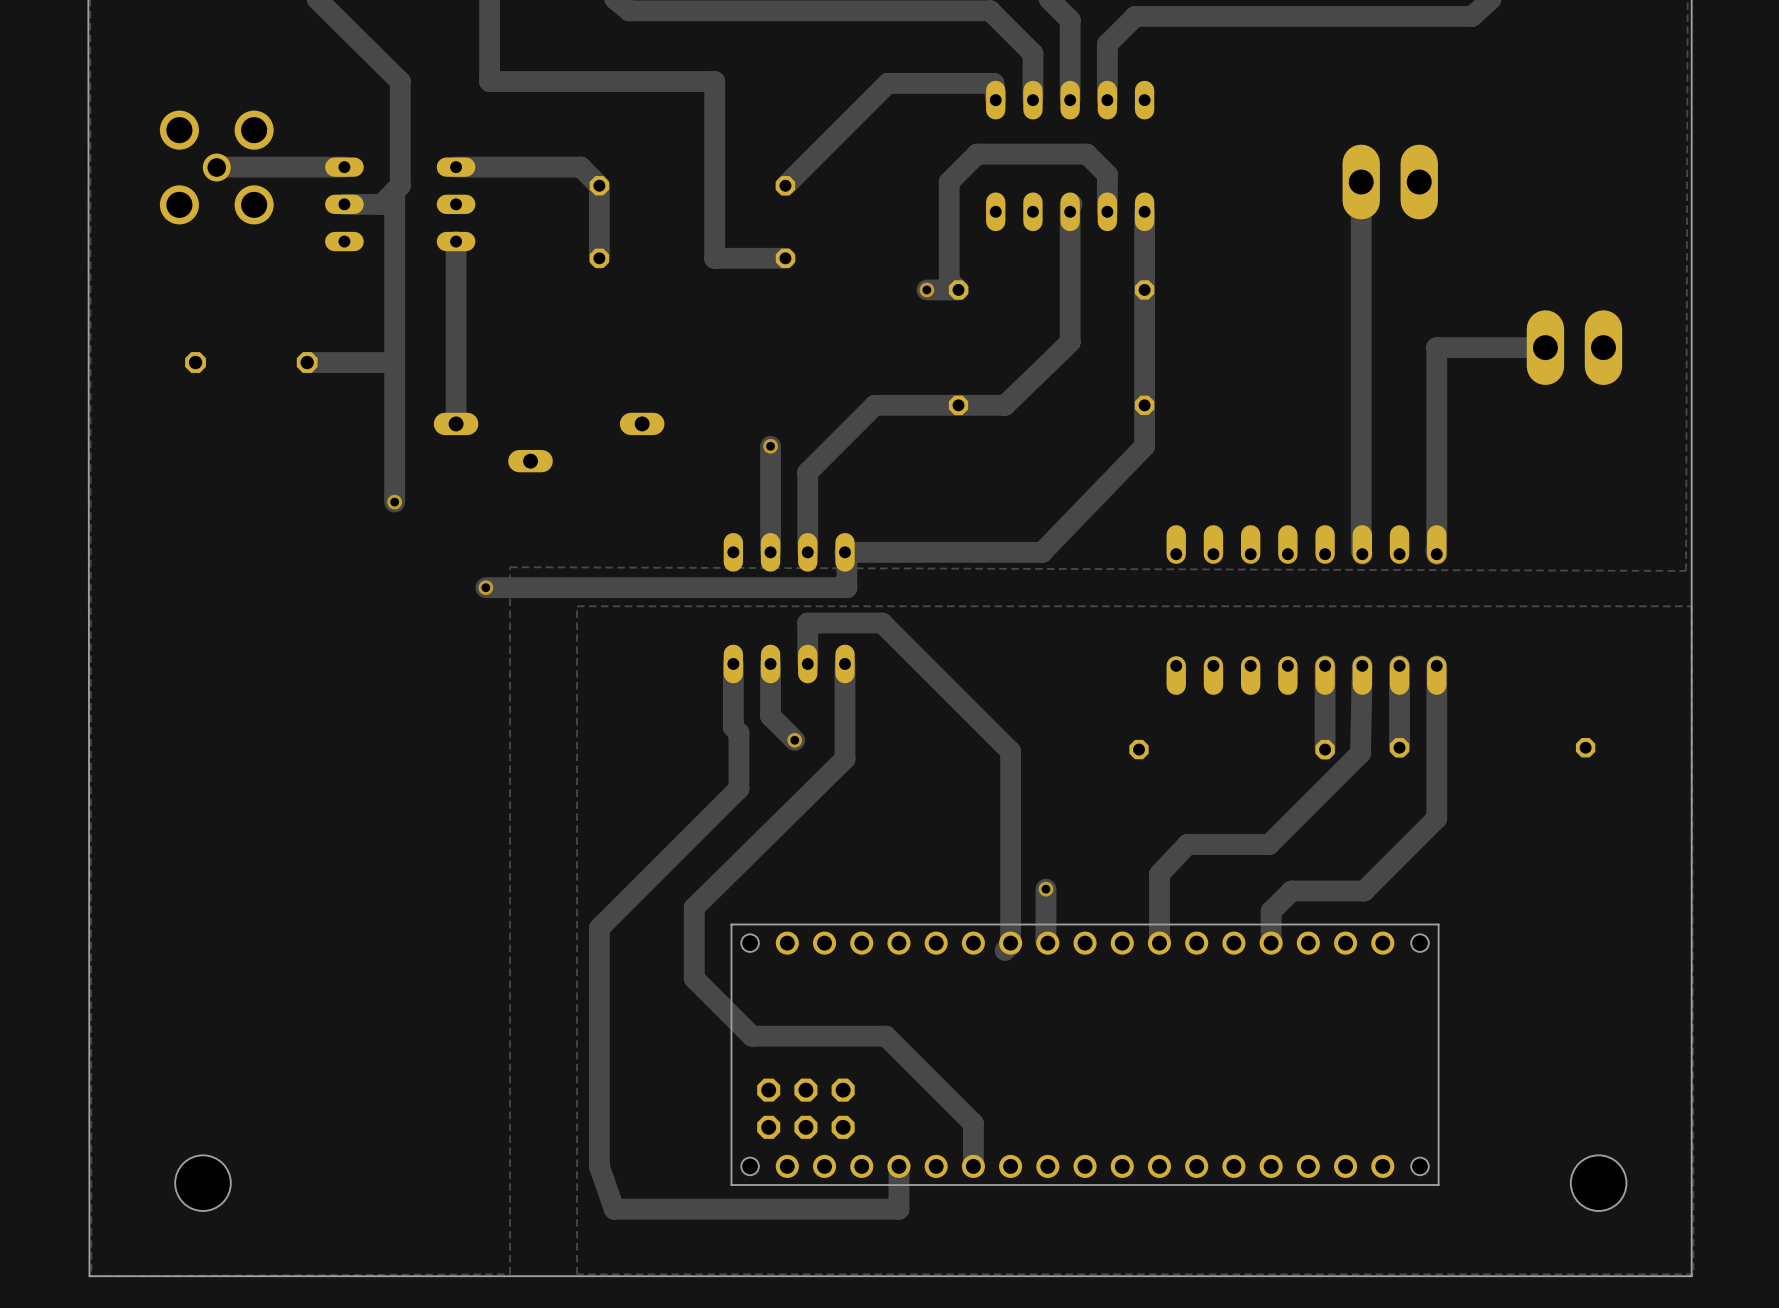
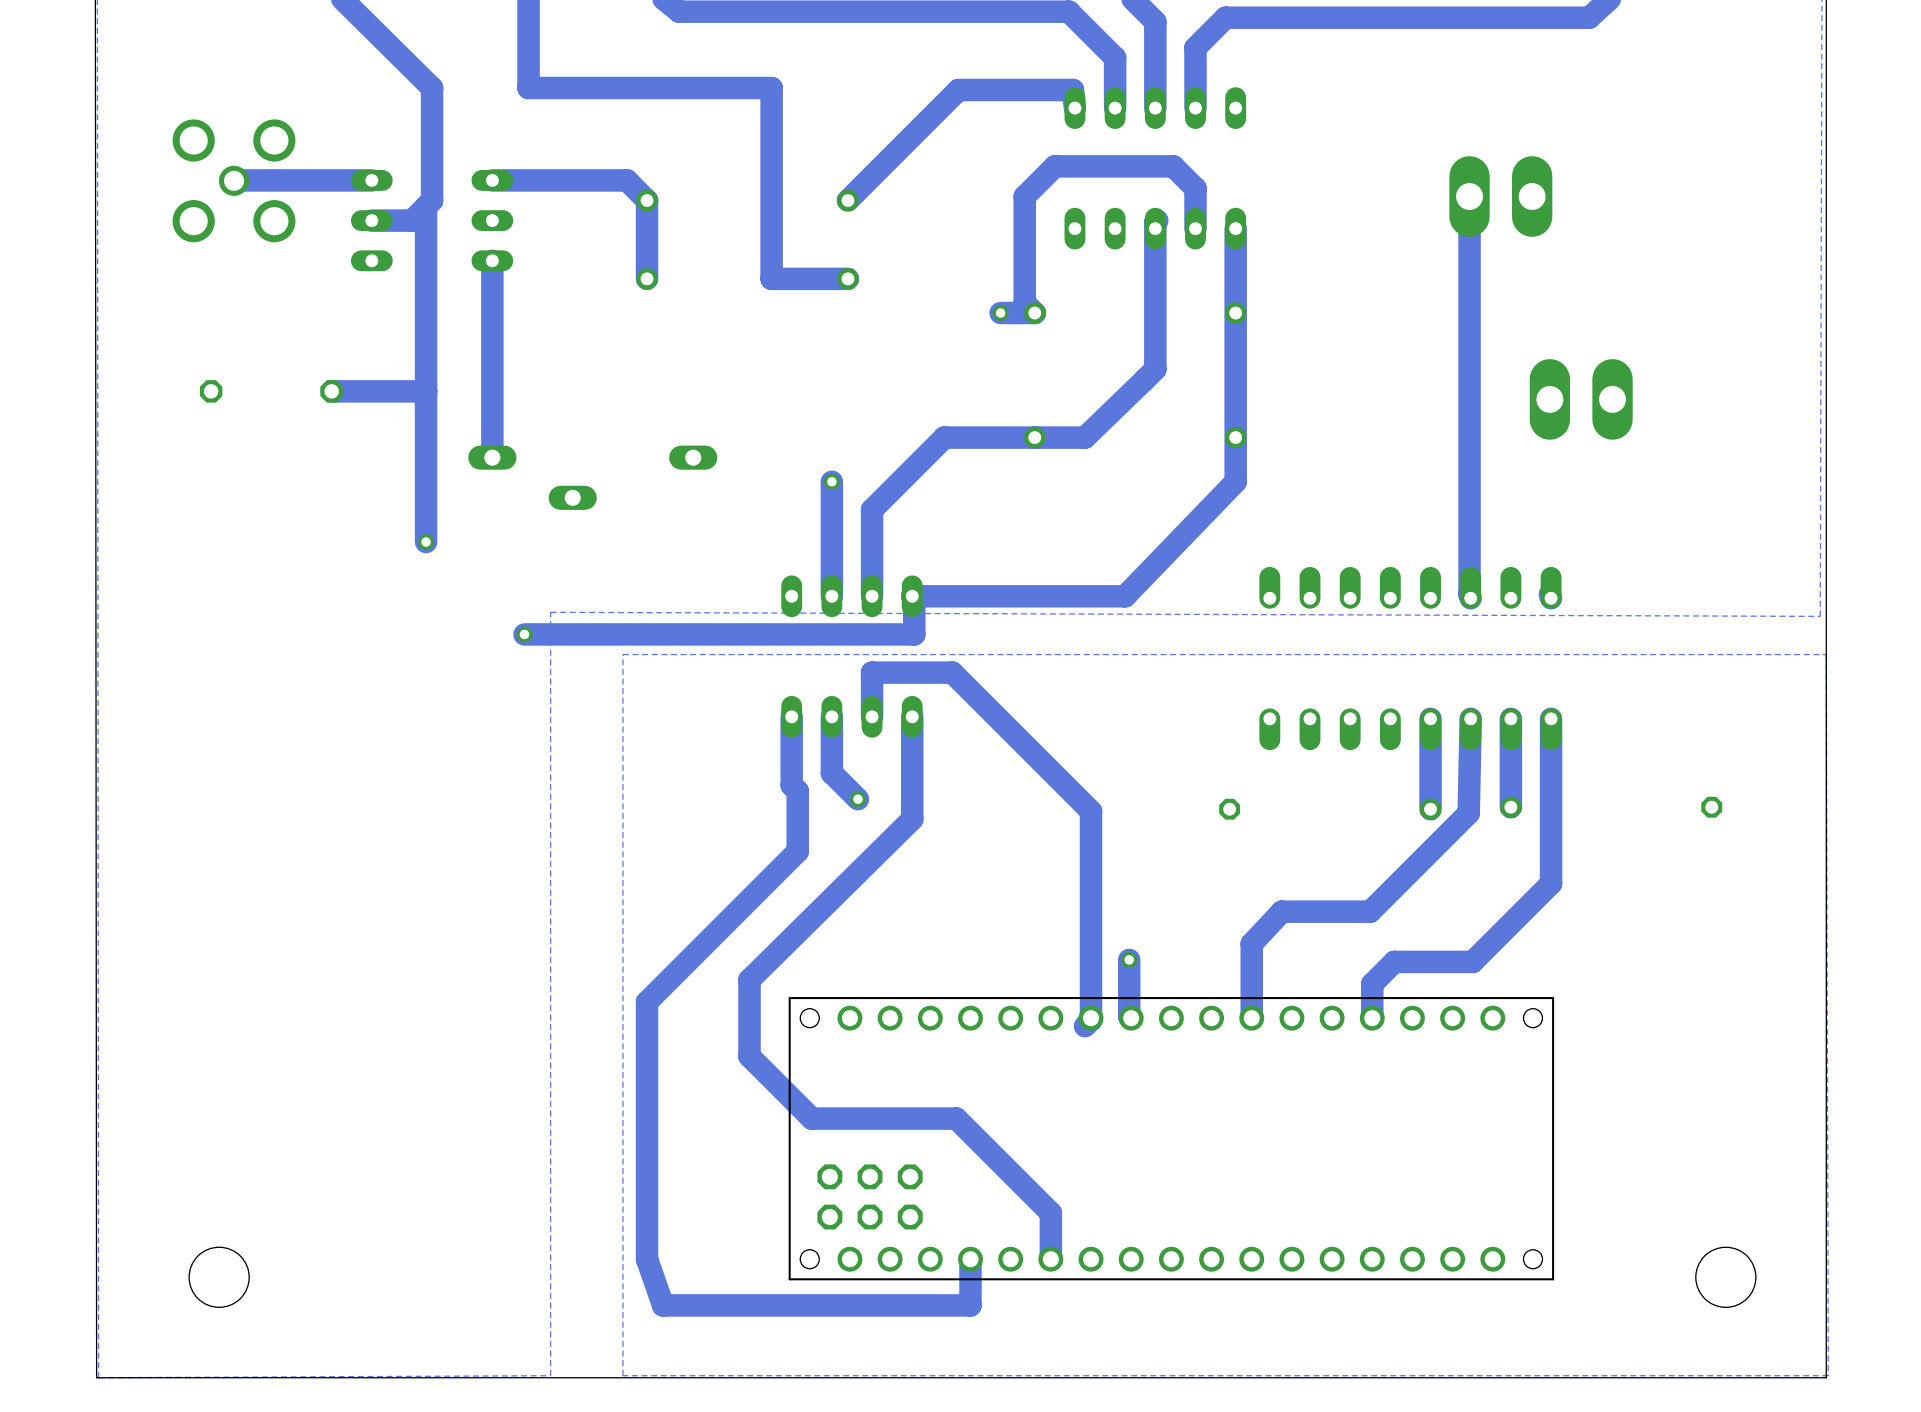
track: (1545, 347) (1436, 347) (1436, 554) -> none
part position: (1574, 347) -> (1581, 399)

